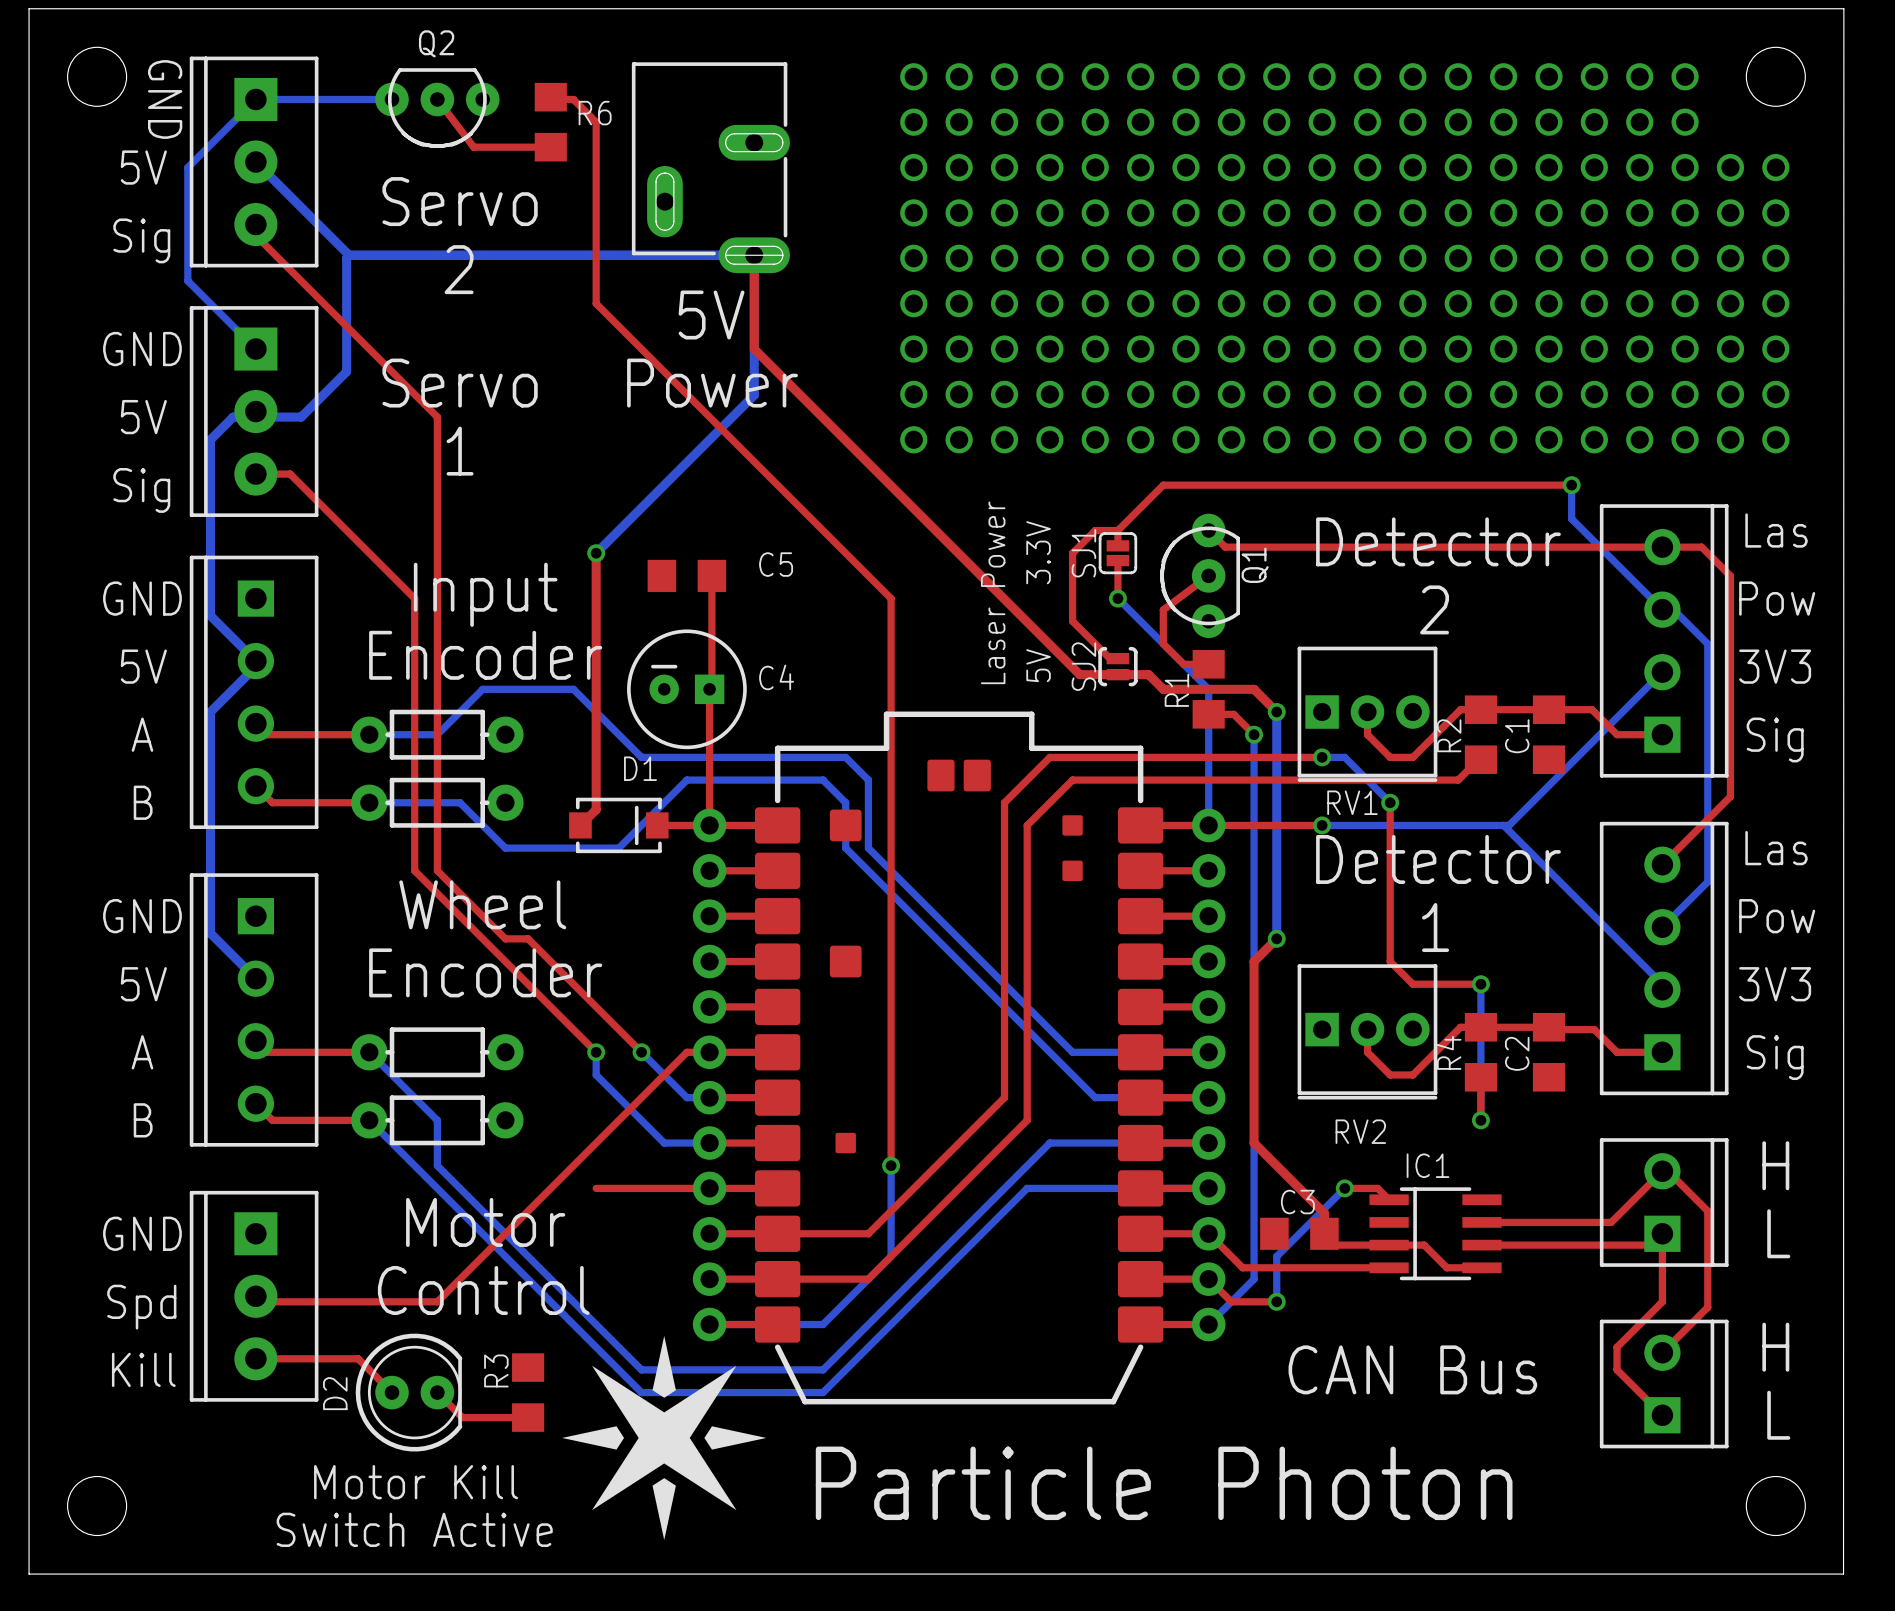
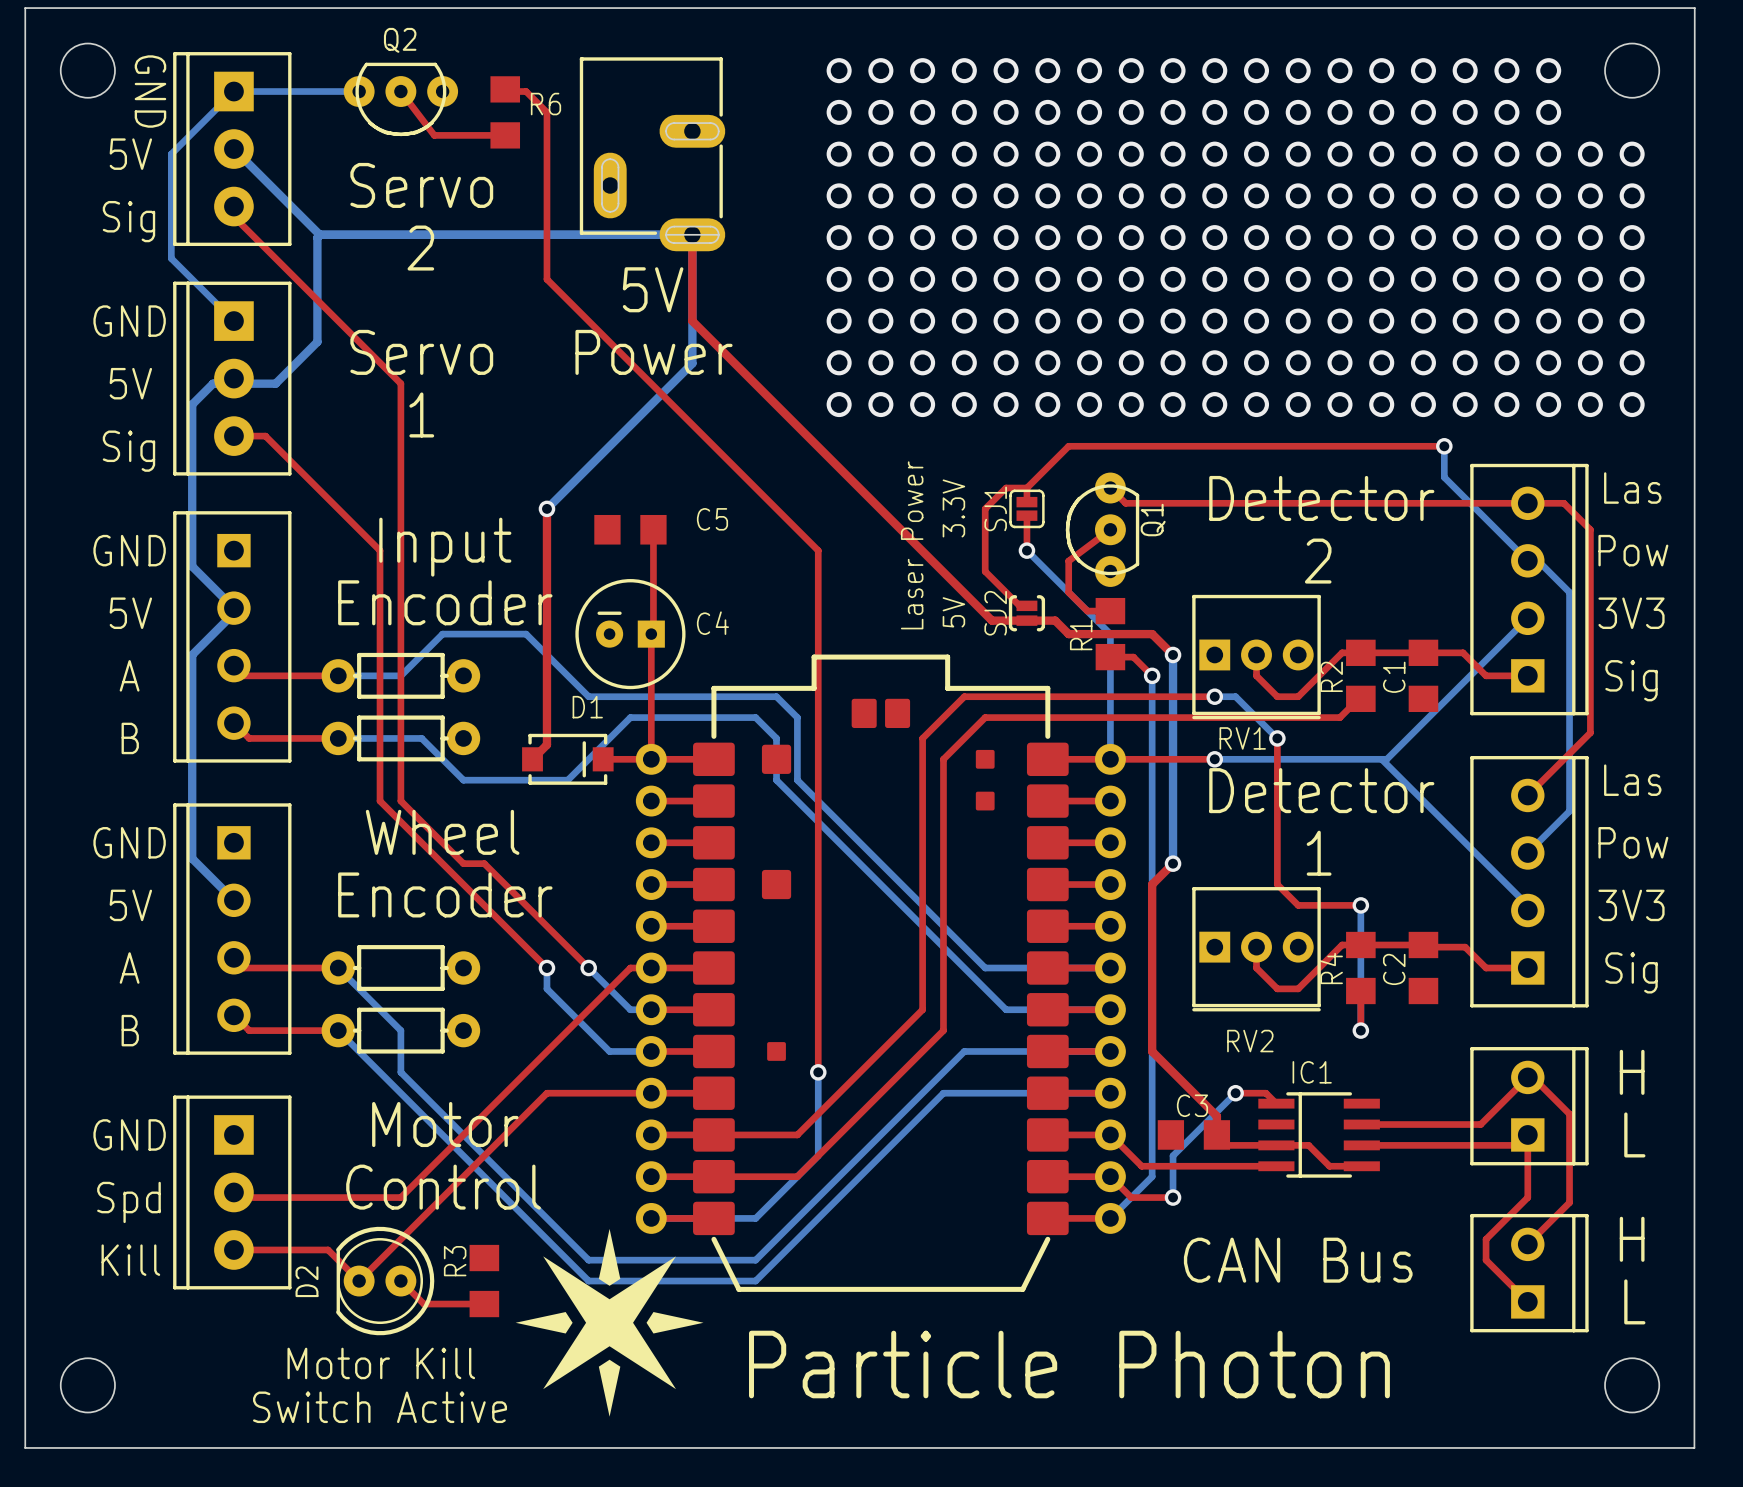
top track: none -> (546, 1093) (359, 1281)
D2 rotation: 0° (409, 1392) -> 180° (385, 1281)

